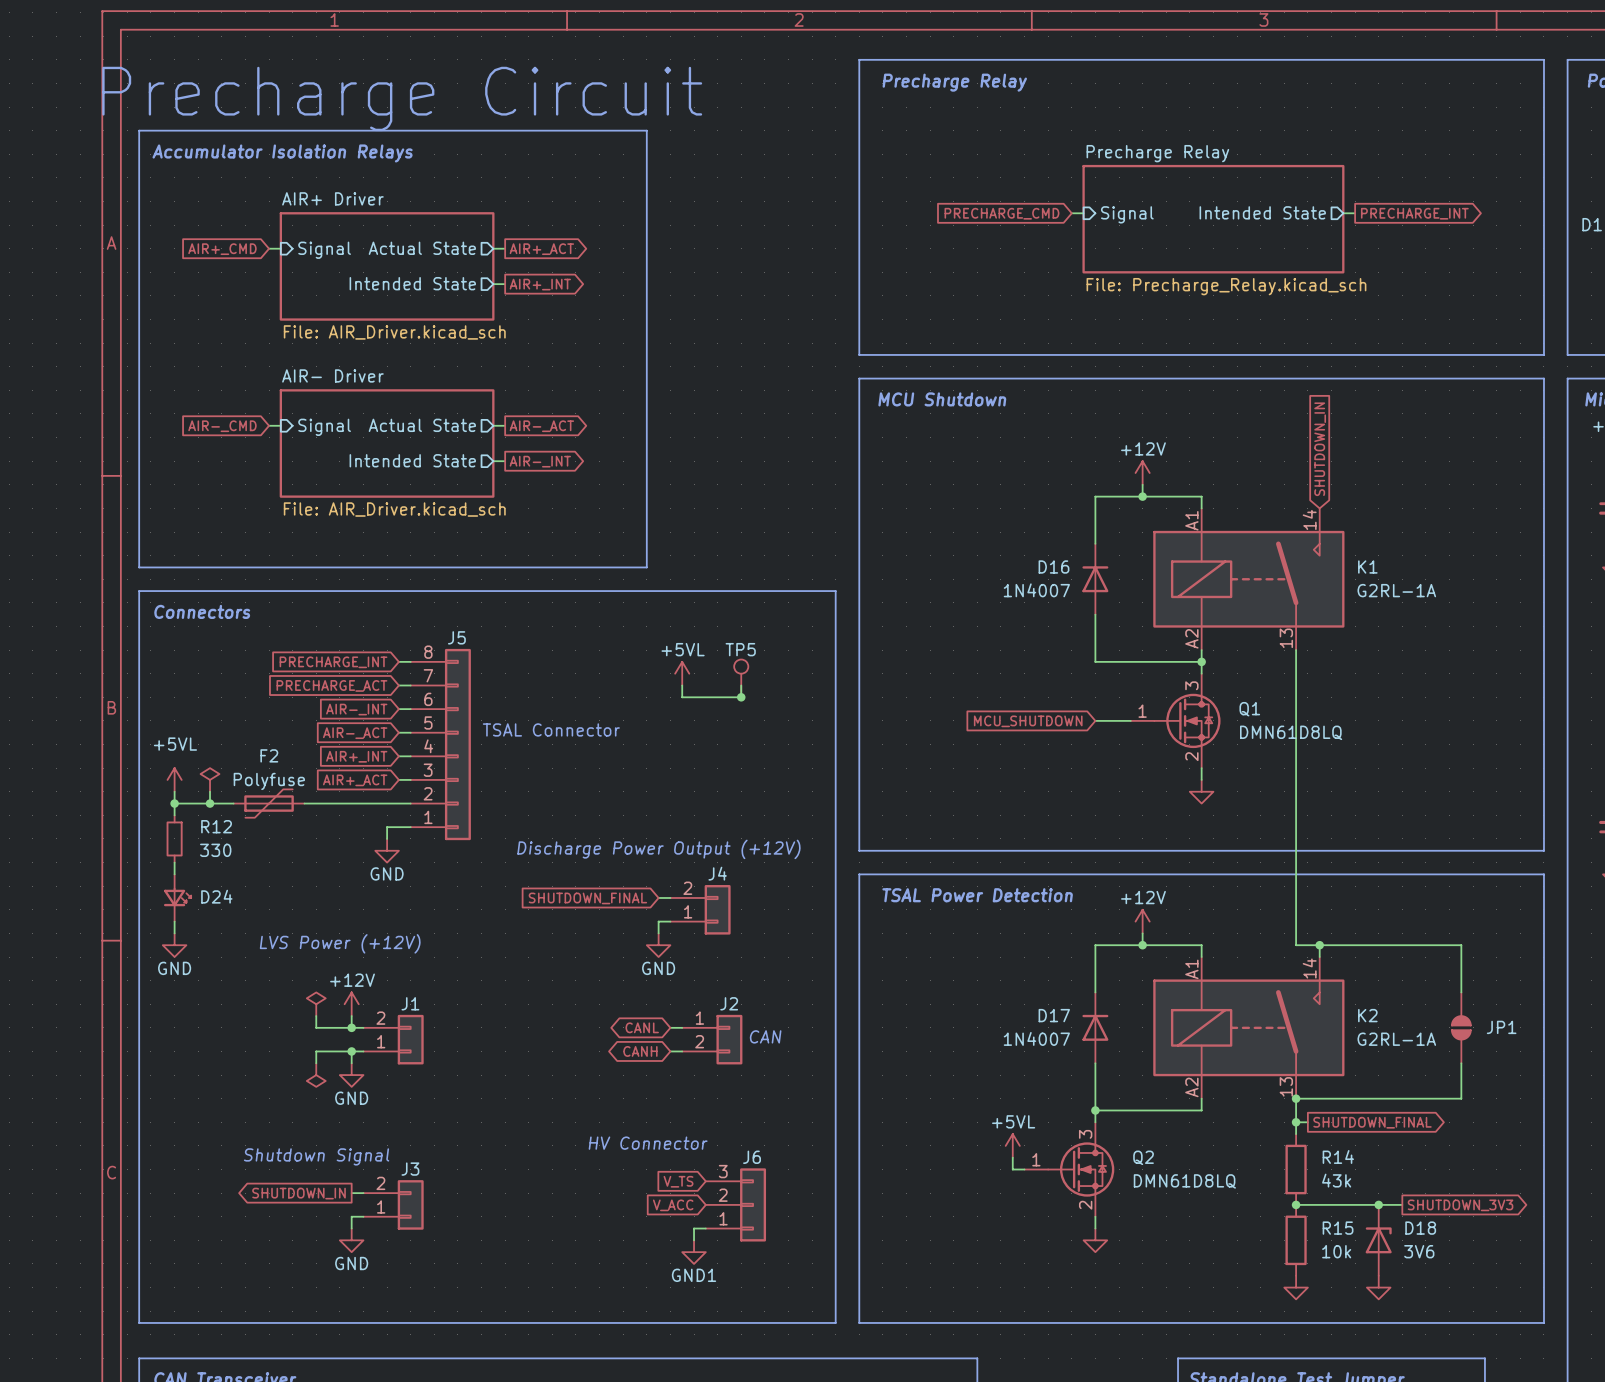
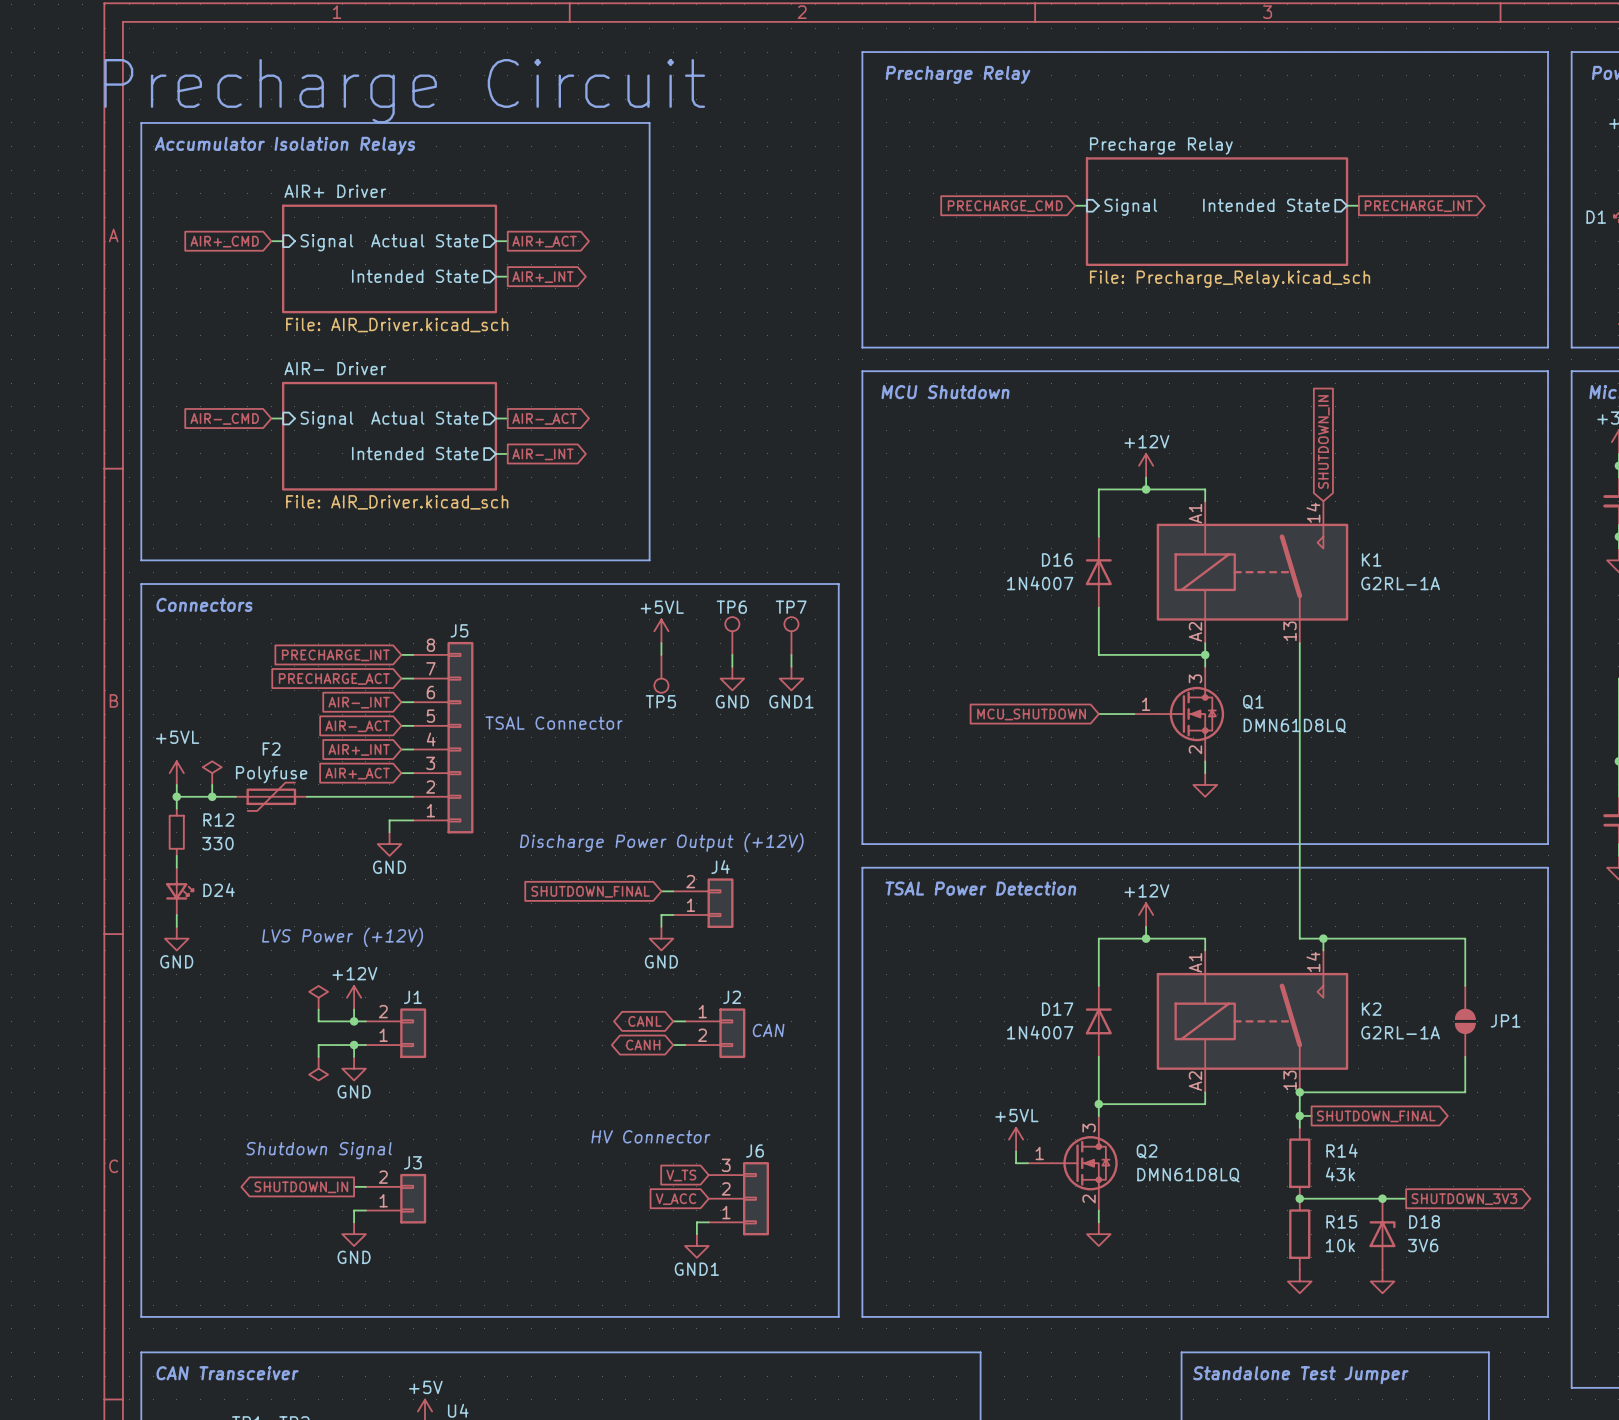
TP6: none -> (732, 636)
TP7: none -> (791, 636)
wire: none -> (661, 643) (661, 654)
wire: none -> (732, 654) (732, 666)
wire: none -> (791, 654) (791, 666)
TP5 rotation: 0° (741, 666) -> 180° (661, 685)
power symbol position: +5VL (682, 673) -> +5VL (661, 631)
TP5 position: (741, 678) -> (661, 673)
wire: (682, 685) (682, 697) (741, 697) (741, 685) -> none
power symbol: none -> GND (732, 678)
power symbol: none -> GND1 (791, 678)
junction: (741, 697) -> none

